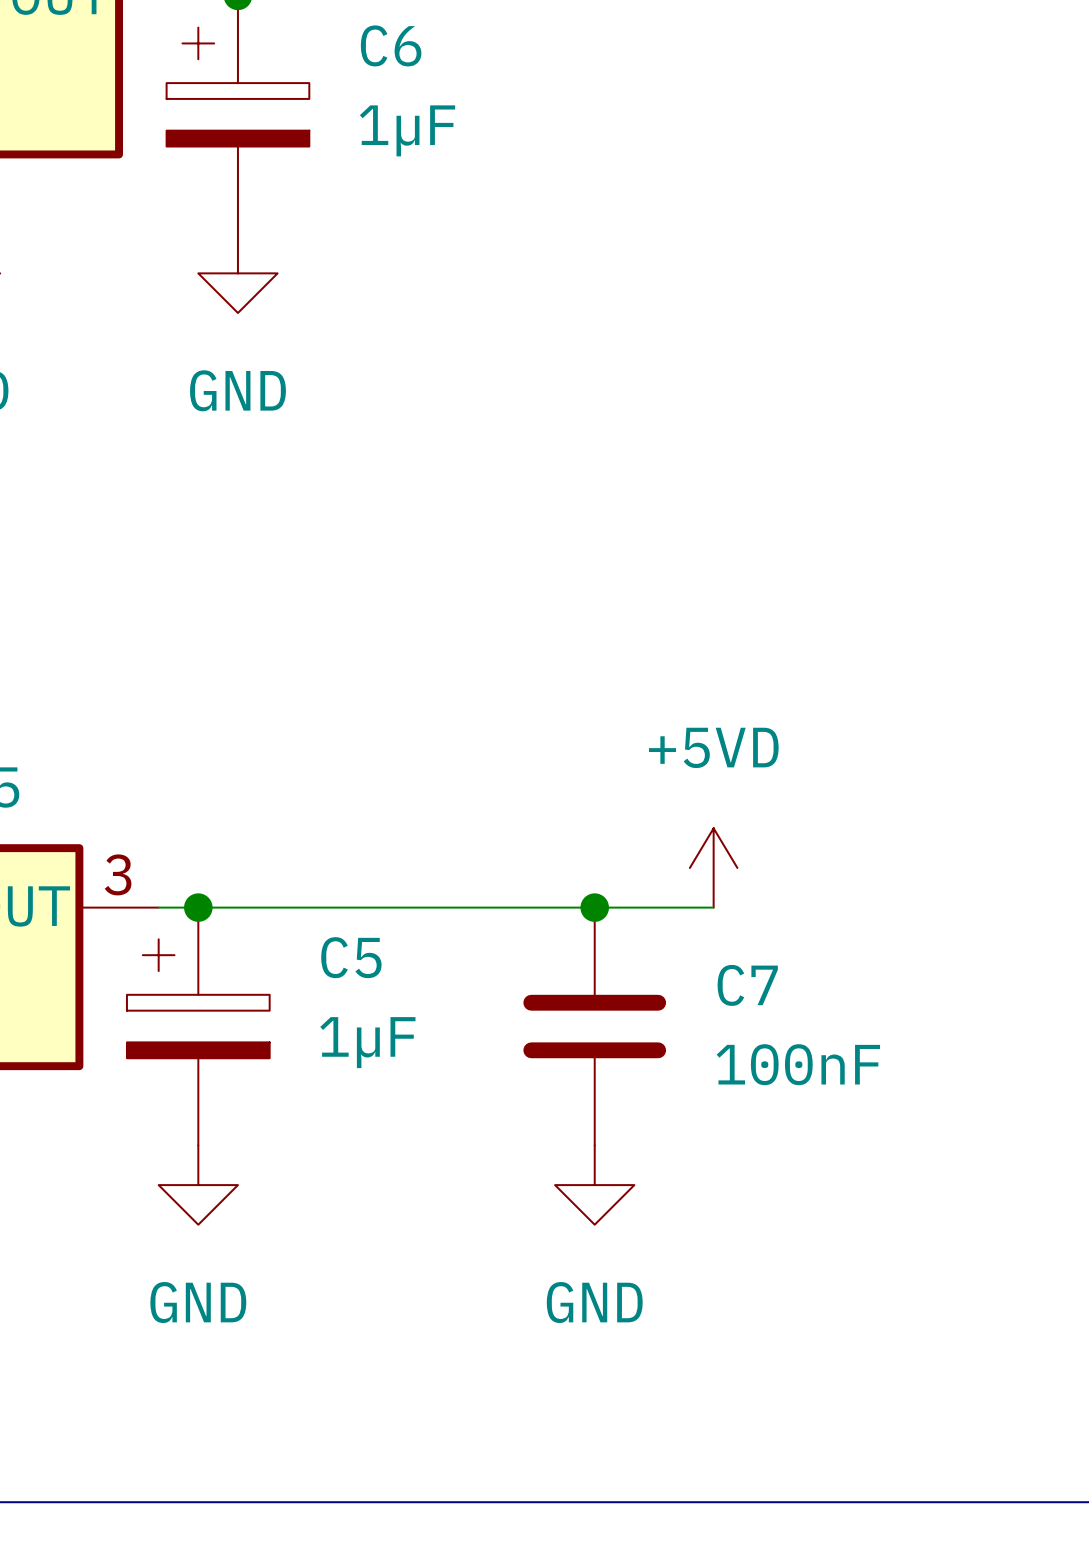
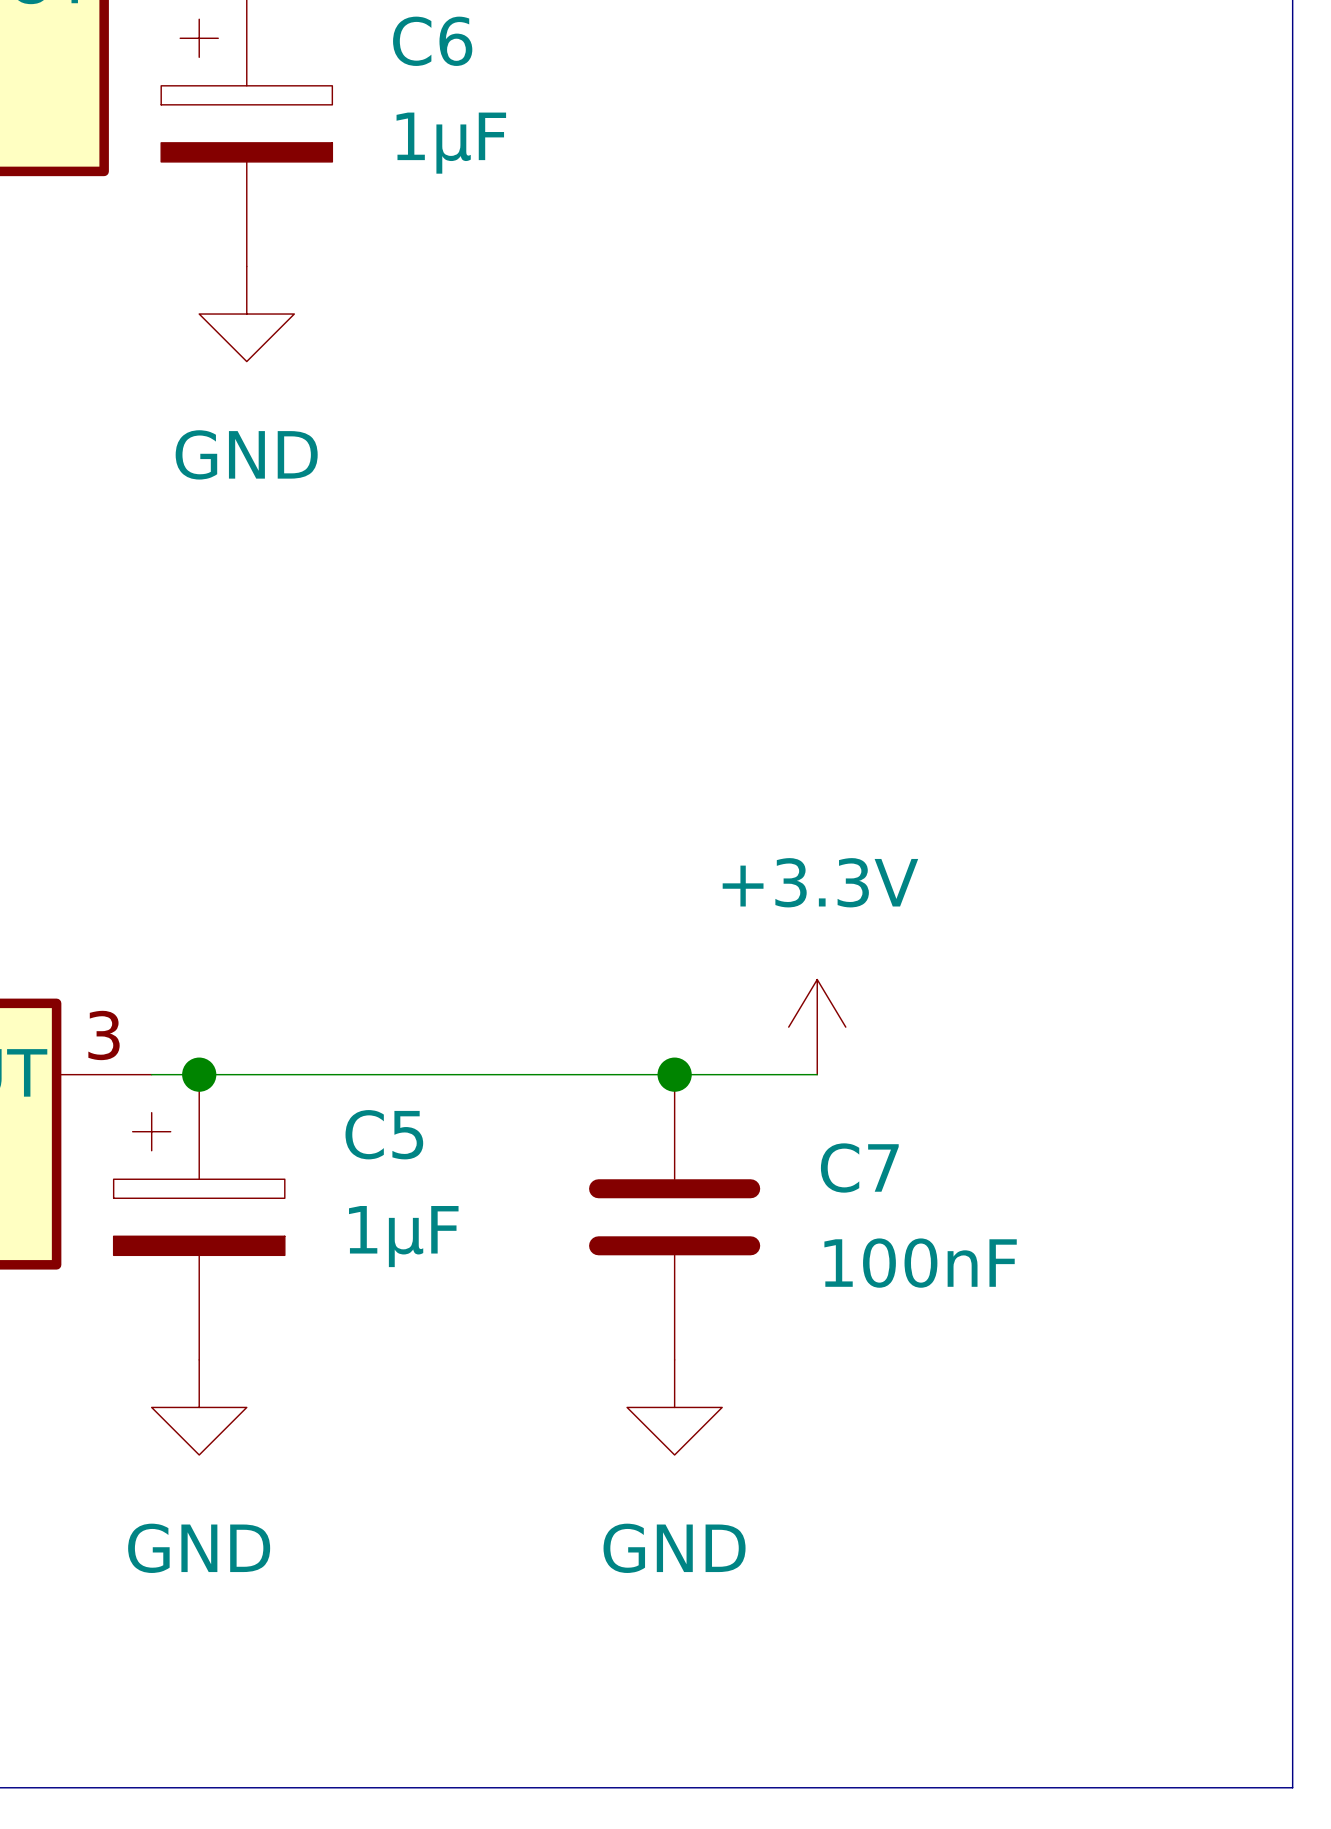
power symbol: +5VD (713, 867) -> +3.3V (817, 1027)

